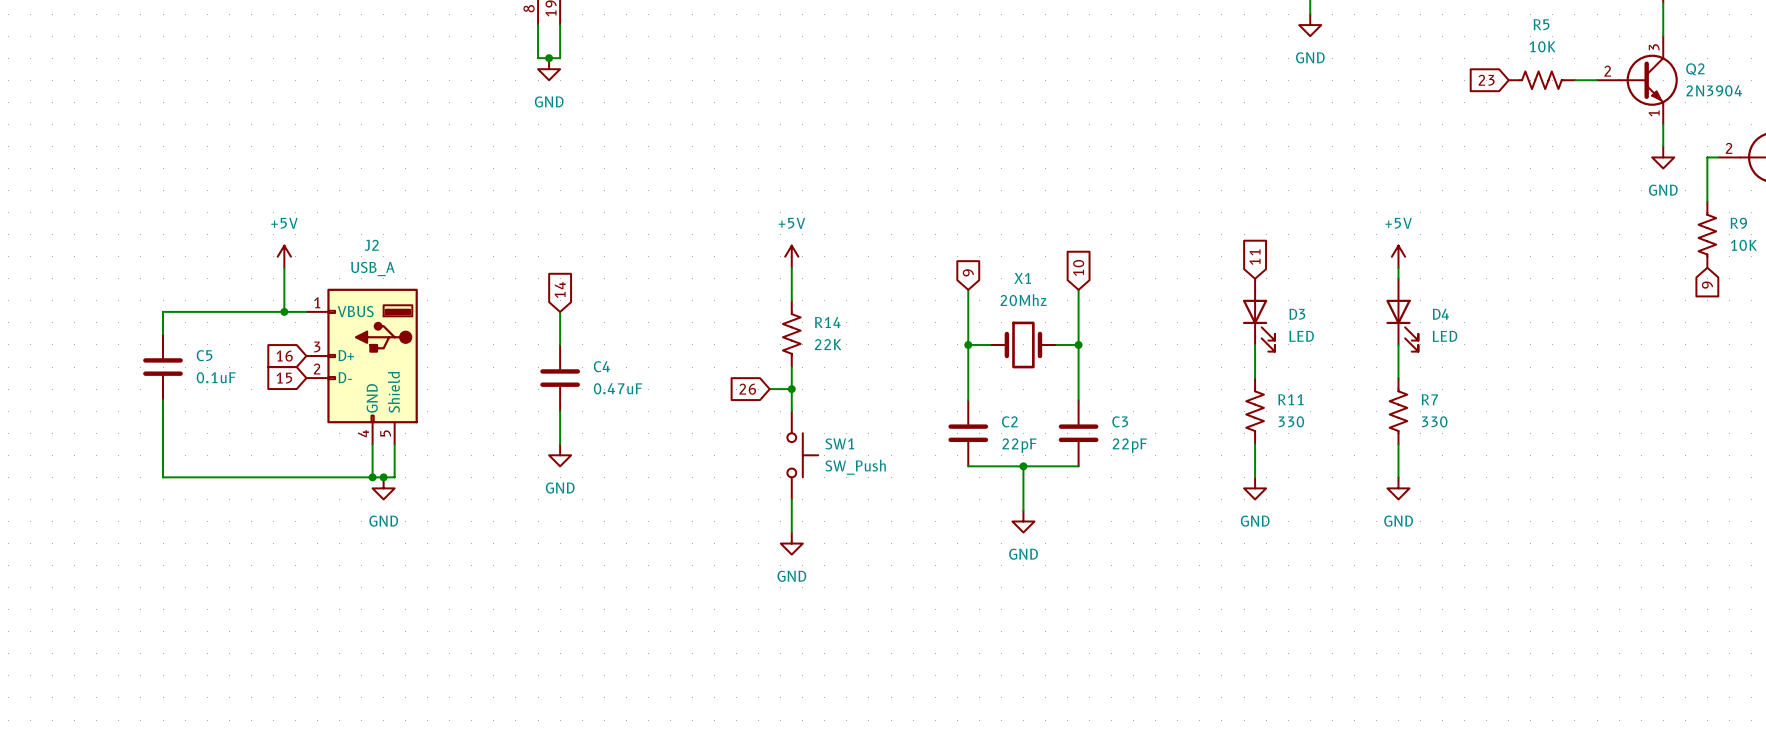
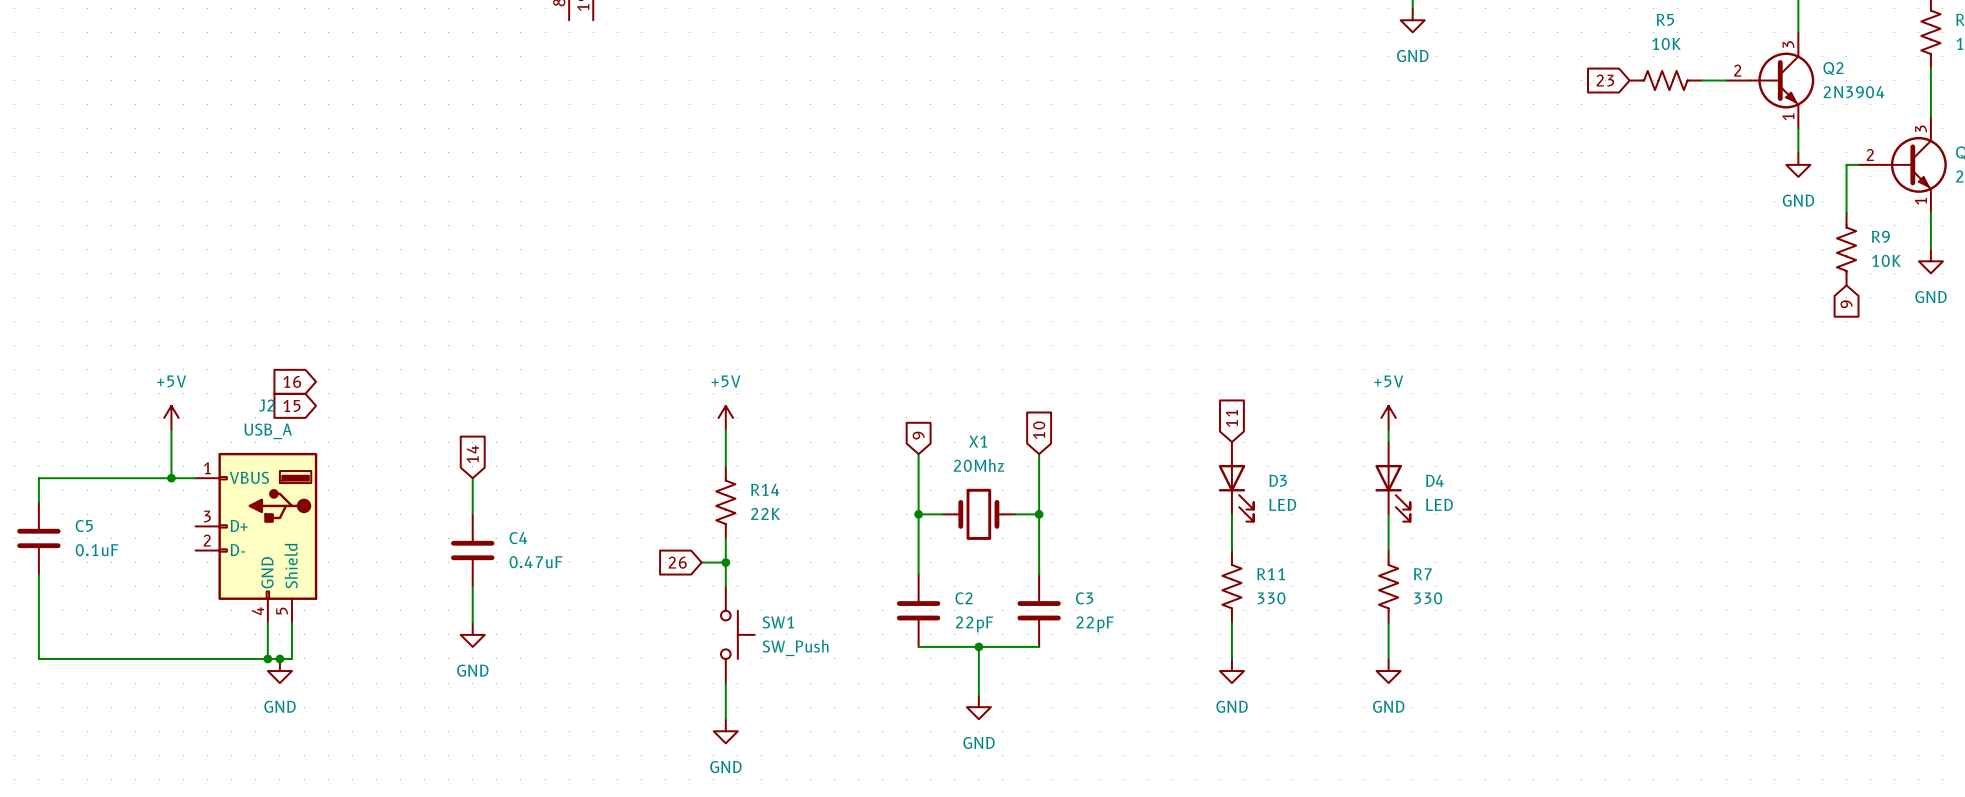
wire: (538, 25) (538, 58) (560, 58) (560, 25) -> none
junction: (549, 58) -> none
power symbol: GND (549, 69) -> none
power symbol position: +5V (284, 256) -> +5V (171, 417)
power symbol position: +5V (791, 256) -> +5V (725, 417)
power symbol position: +5V (1398, 256) -> +5V (1388, 417)
global label position: 11 (1255, 257) -> 11 (1231, 418)
wire: (284, 267) (284, 311) -> (171, 430) (171, 478)
wire: (791, 267) (791, 300) -> (725, 430) (725, 466)
global label position: 10 (1078, 267) -> 10 (1039, 430)
wire: (1398, 267) (1398, 278) -> (1388, 430) (1388, 442)
global label position: 9 (968, 272) -> 9 (918, 435)
wire: (968, 289) (968, 400) -> (918, 454) (918, 574)
wire: (1078, 289) (1078, 400) -> (1039, 454) (1039, 574)
global label position: 14 (560, 290) -> 14 (472, 454)
junction: (284, 311) -> none
wire: (306, 311) (163, 311) (163, 333) -> (195, 478) (38, 478) (38, 502)
wire: (560, 311) (560, 344) -> (472, 478) (472, 514)
D3 position: (1258, 315) -> (1236, 481)
D4 position: (1402, 315) -> (1392, 481)
R14 position: (791, 333) -> (725, 502)
wire: (968, 344) (990, 344) -> (918, 514) (942, 514)
junction: (968, 344) -> none
X1 position: (1023, 344) -> (978, 514)
wire: (1056, 344) (1078, 344) -> (1015, 514) (1039, 514)
junction: (1078, 344) -> none
wire: (1255, 344) (1255, 378) -> (1231, 514) (1231, 550)
wire: (1398, 344) (1398, 378) -> (1388, 514) (1388, 550)
J2 position: (362, 366) -> (256, 537)
C5 position: (163, 367) -> (38, 538)
wire: (791, 367) (791, 411) -> (725, 538) (725, 586)
C4 position: (560, 378) -> (472, 550)
global label position: 26 (747, 389) -> 26 (677, 562)
wire: (769, 389) (791, 389) -> (701, 562) (725, 562)
junction: (791, 389) -> none
wire: (163, 400) (163, 477) (394, 477) (394, 444) -> (38, 574) (38, 658) (291, 658) (291, 622)
wire: (560, 411) (560, 444) -> (472, 586) (472, 622)
R11 position: (1255, 411) -> (1231, 586)
R7 position: (1398, 411) -> (1388, 586)
C2 position: (968, 433) -> (918, 610)
C3 position: (1078, 433) -> (1039, 610)
junction: none -> (171, 478)
wire: (372, 444) (372, 477) -> (267, 622) (267, 658)
wire: (1255, 444) (1255, 477) -> (1231, 622) (1231, 658)
wire: (1398, 444) (1398, 477) -> (1388, 622) (1388, 658)
power symbol: GND (560, 455) -> none
SW1 position: (802, 455) -> (737, 634)
wire: (968, 466) (1078, 466) -> (918, 646) (1039, 646)
wire: (1023, 466) (1023, 510) -> (978, 646) (978, 695)
junction: (1023, 466) -> none
junction: (372, 477) -> none
junction: (383, 477) -> none
junction: none -> (918, 514)
junction: none -> (1039, 514)
power symbol: GND (383, 488) -> none
power symbol: GND (1255, 488) -> none
power symbol: GND (1398, 488) -> none
wire: (791, 499) (791, 532) -> (725, 683) (725, 719)
junction: none -> (725, 562)
power symbol: GND (1023, 521) -> none
power symbol: GND (791, 543) -> none
power symbol: none -> GND (472, 634)
junction: none -> (978, 646)
junction: none -> (267, 658)
junction: none -> (279, 658)
power symbol: none -> GND (279, 671)
power symbol: none -> GND (1231, 671)
power symbol: none -> GND (1388, 671)
power symbol: none -> GND (978, 707)
power symbol: none -> GND (725, 731)

